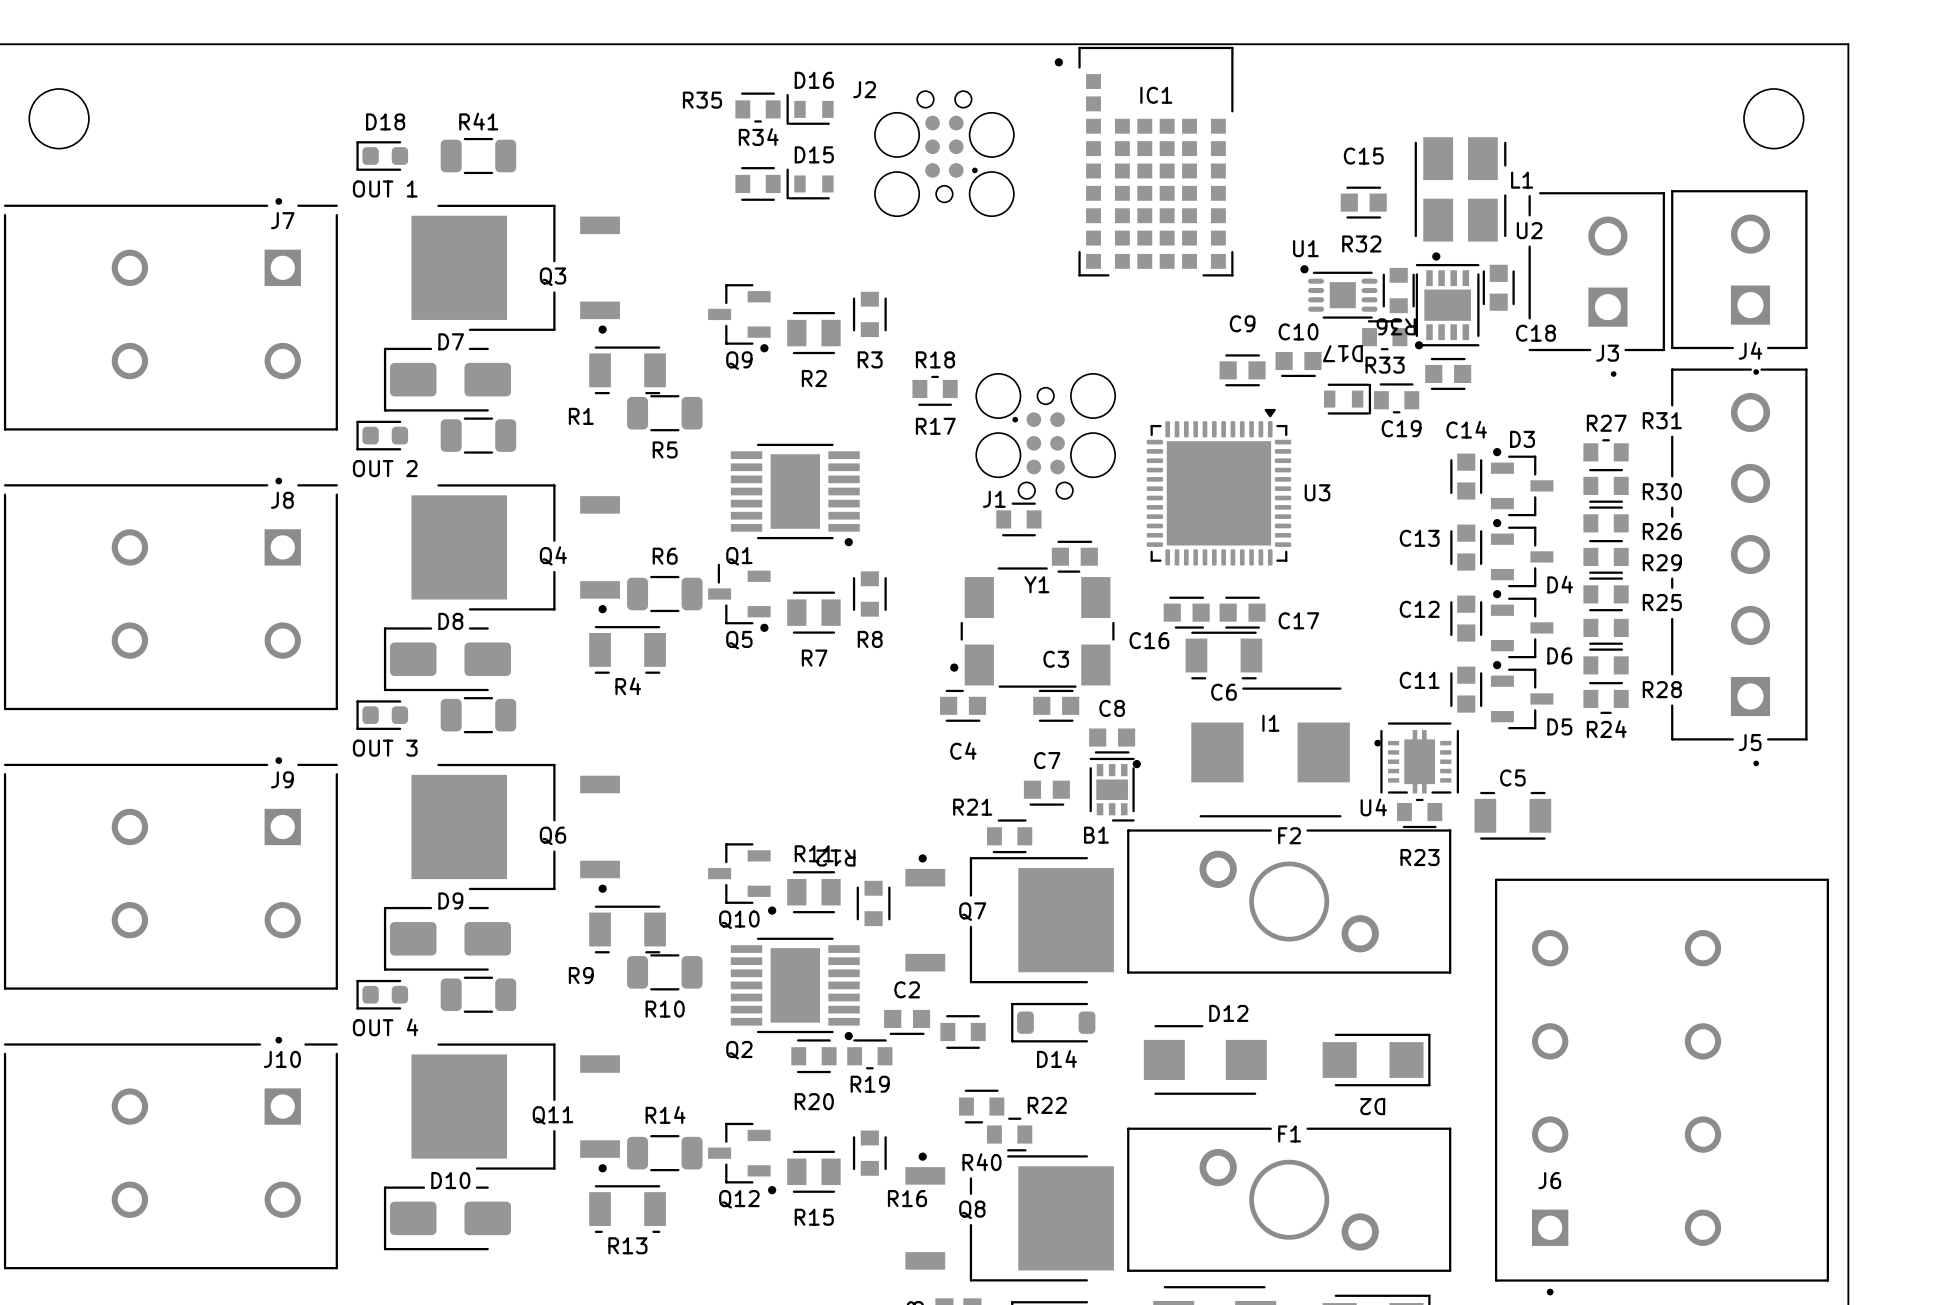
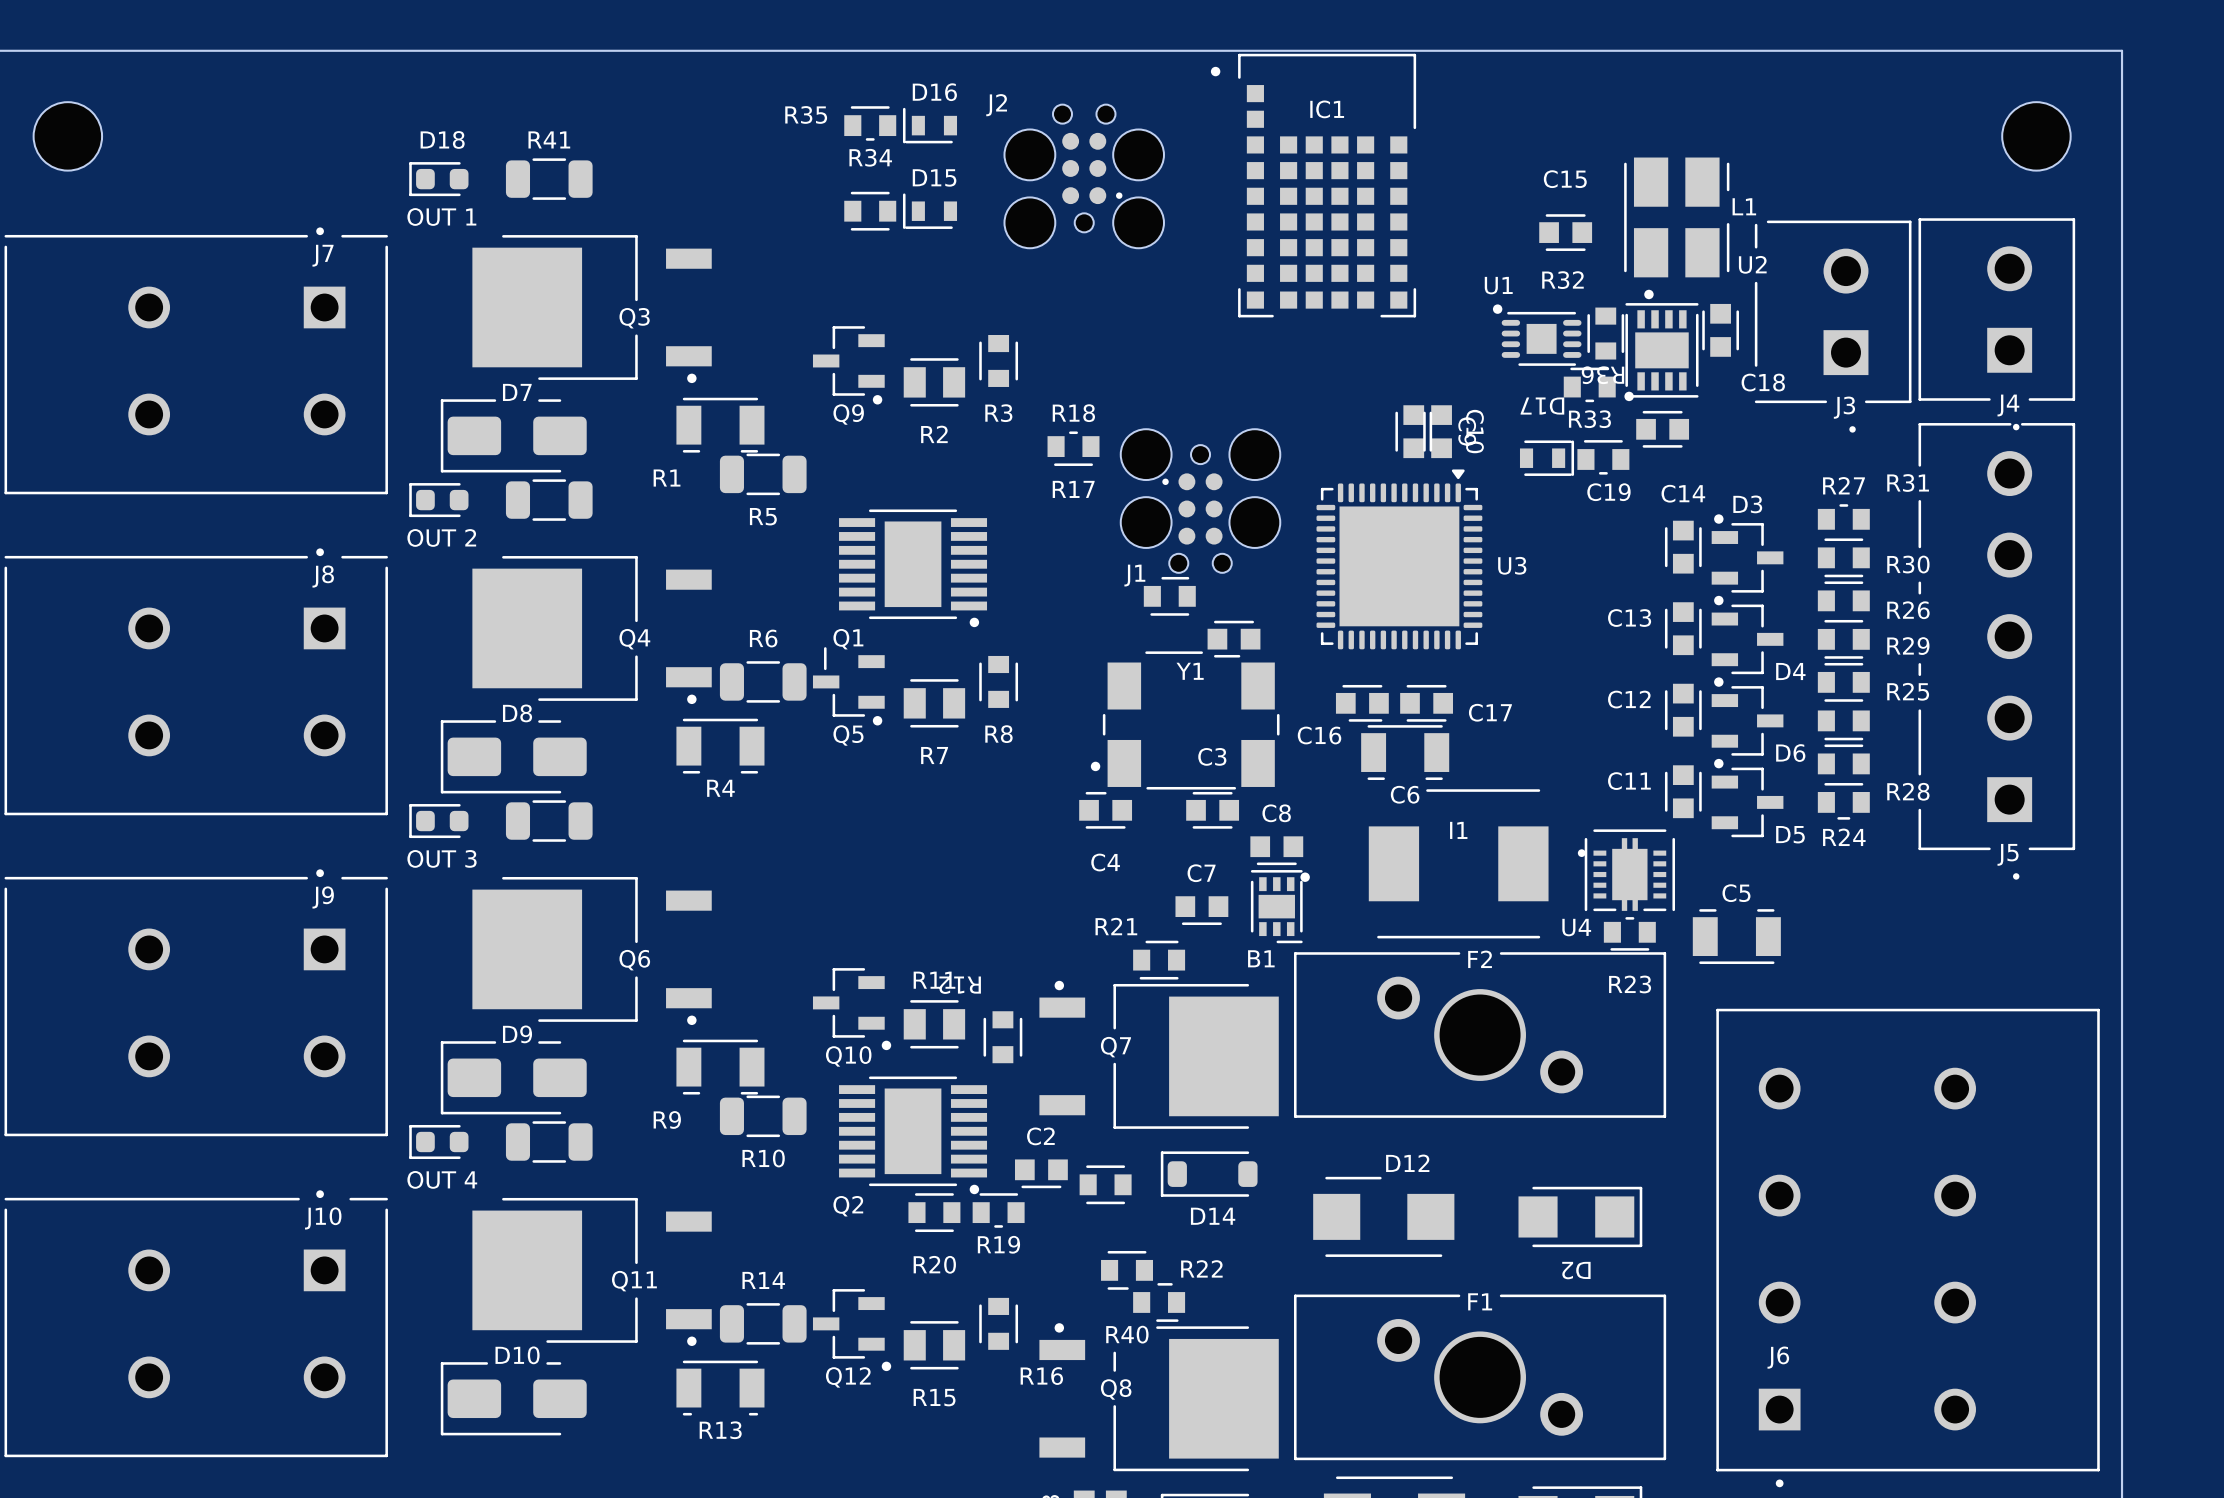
C10 rotation: 0° (1298, 364) -> 90° clockwise (1437, 431)
C10 position: (1298, 364) -> (1437, 431)
C9 rotation: 0° (1242, 370) -> 90° clockwise (1413, 431)
I1 footprint: [1191, 687, 1350, 818] -> [1368, 789, 1549, 939]

